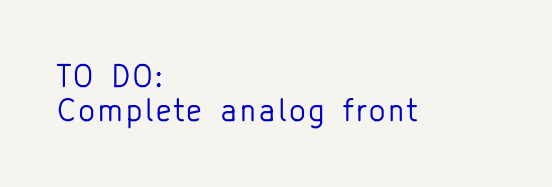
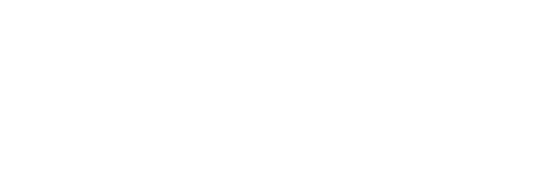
text: TO DO: (108, 75) -> none
text: Complete analog front (237, 113) -> none

